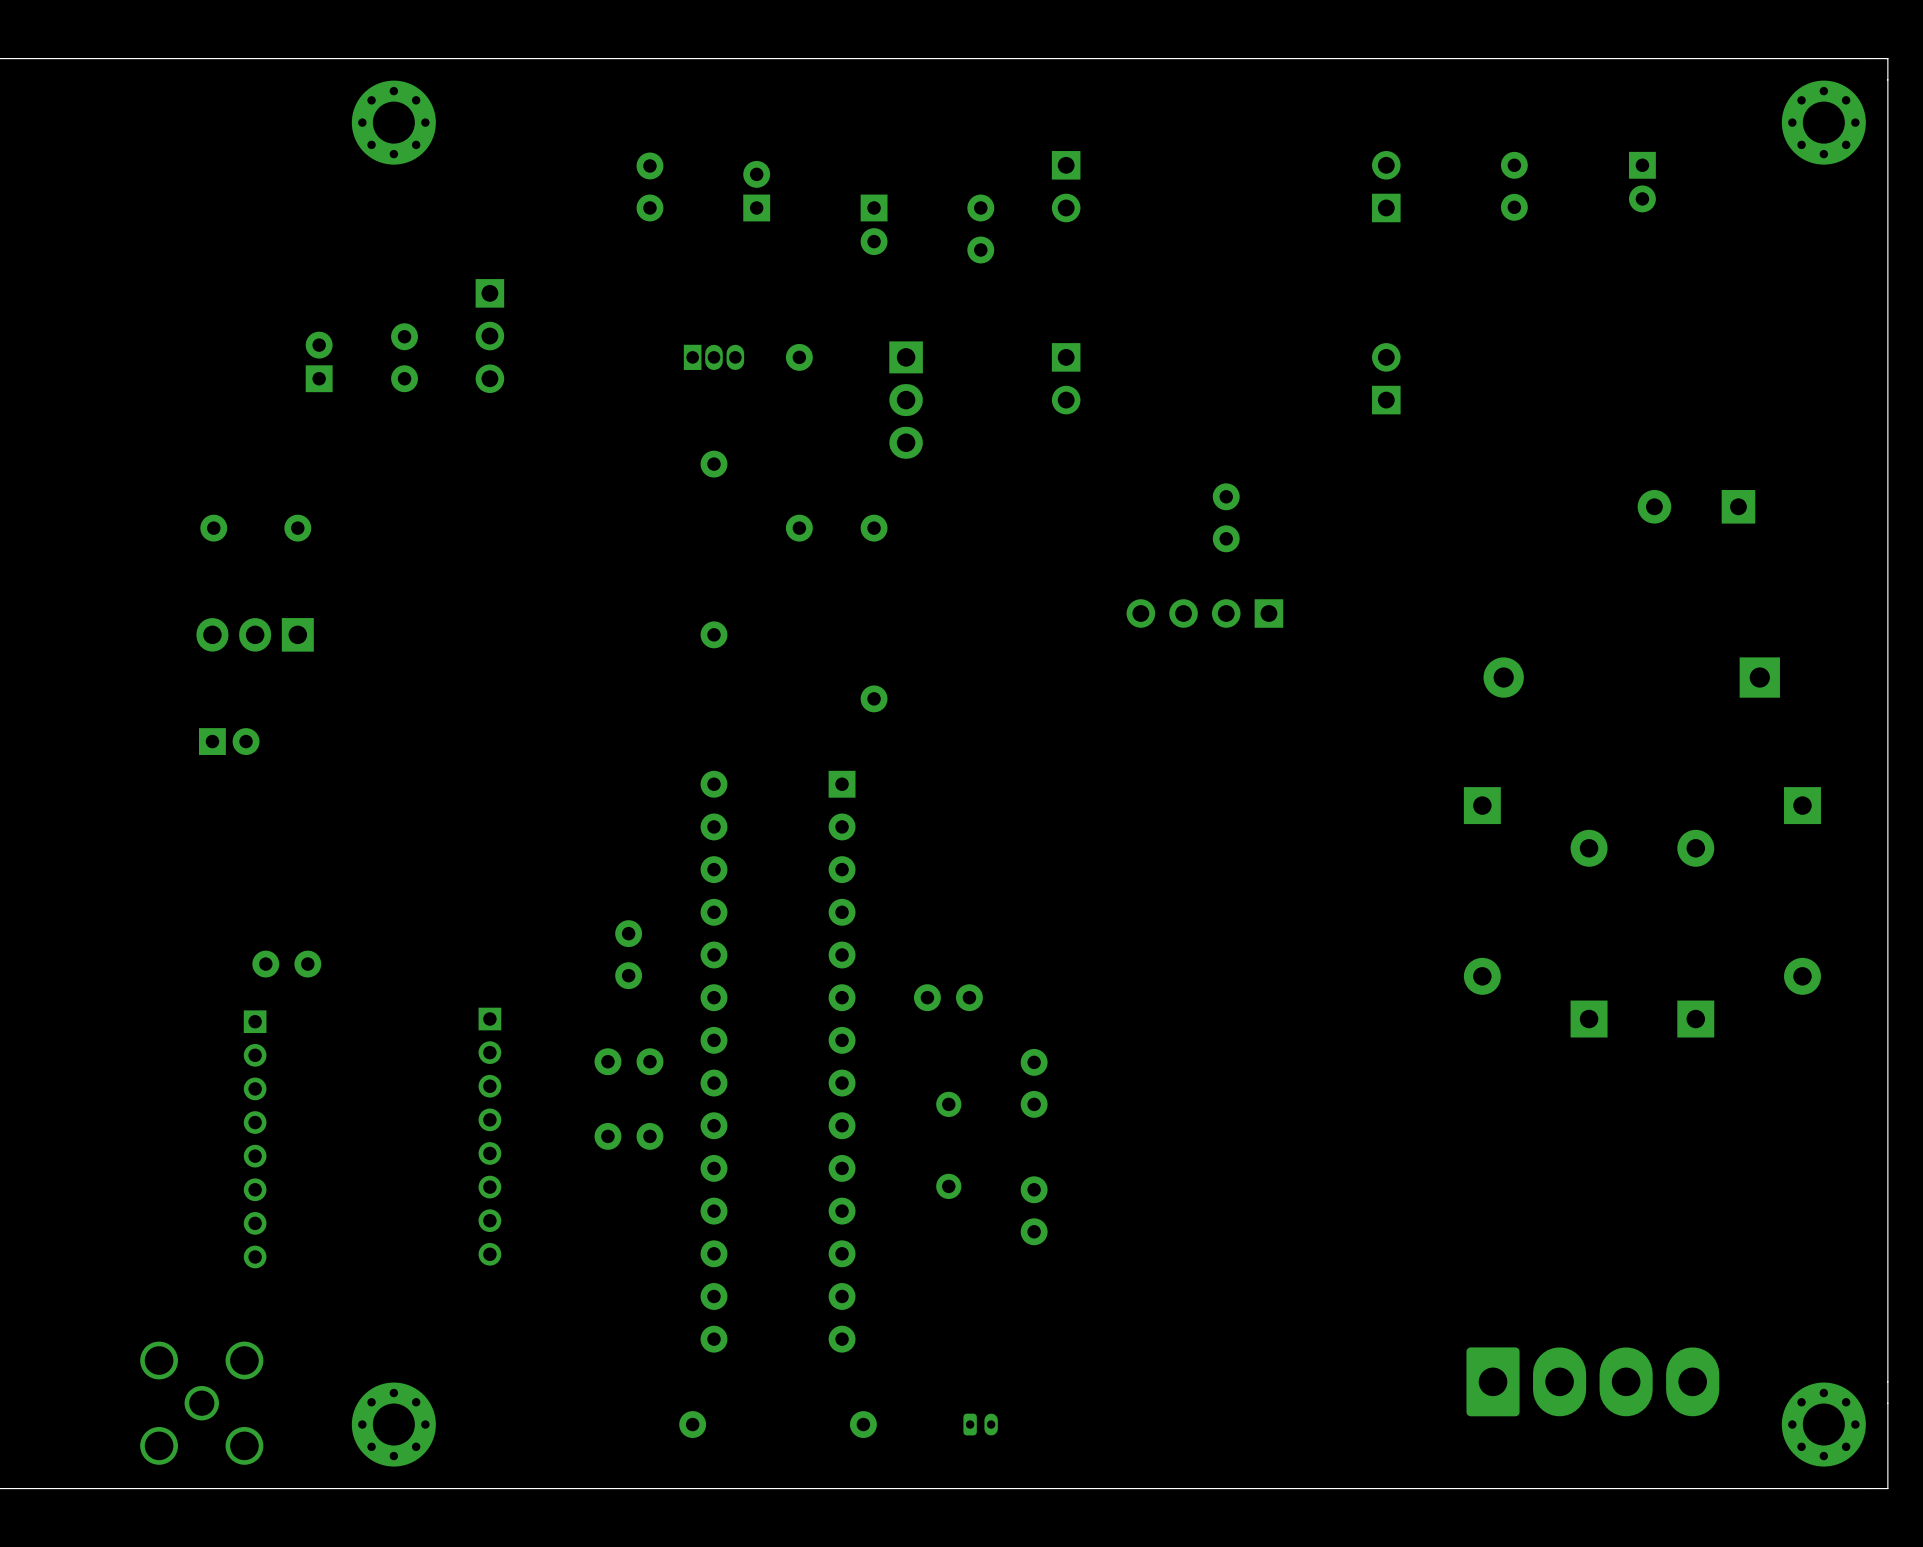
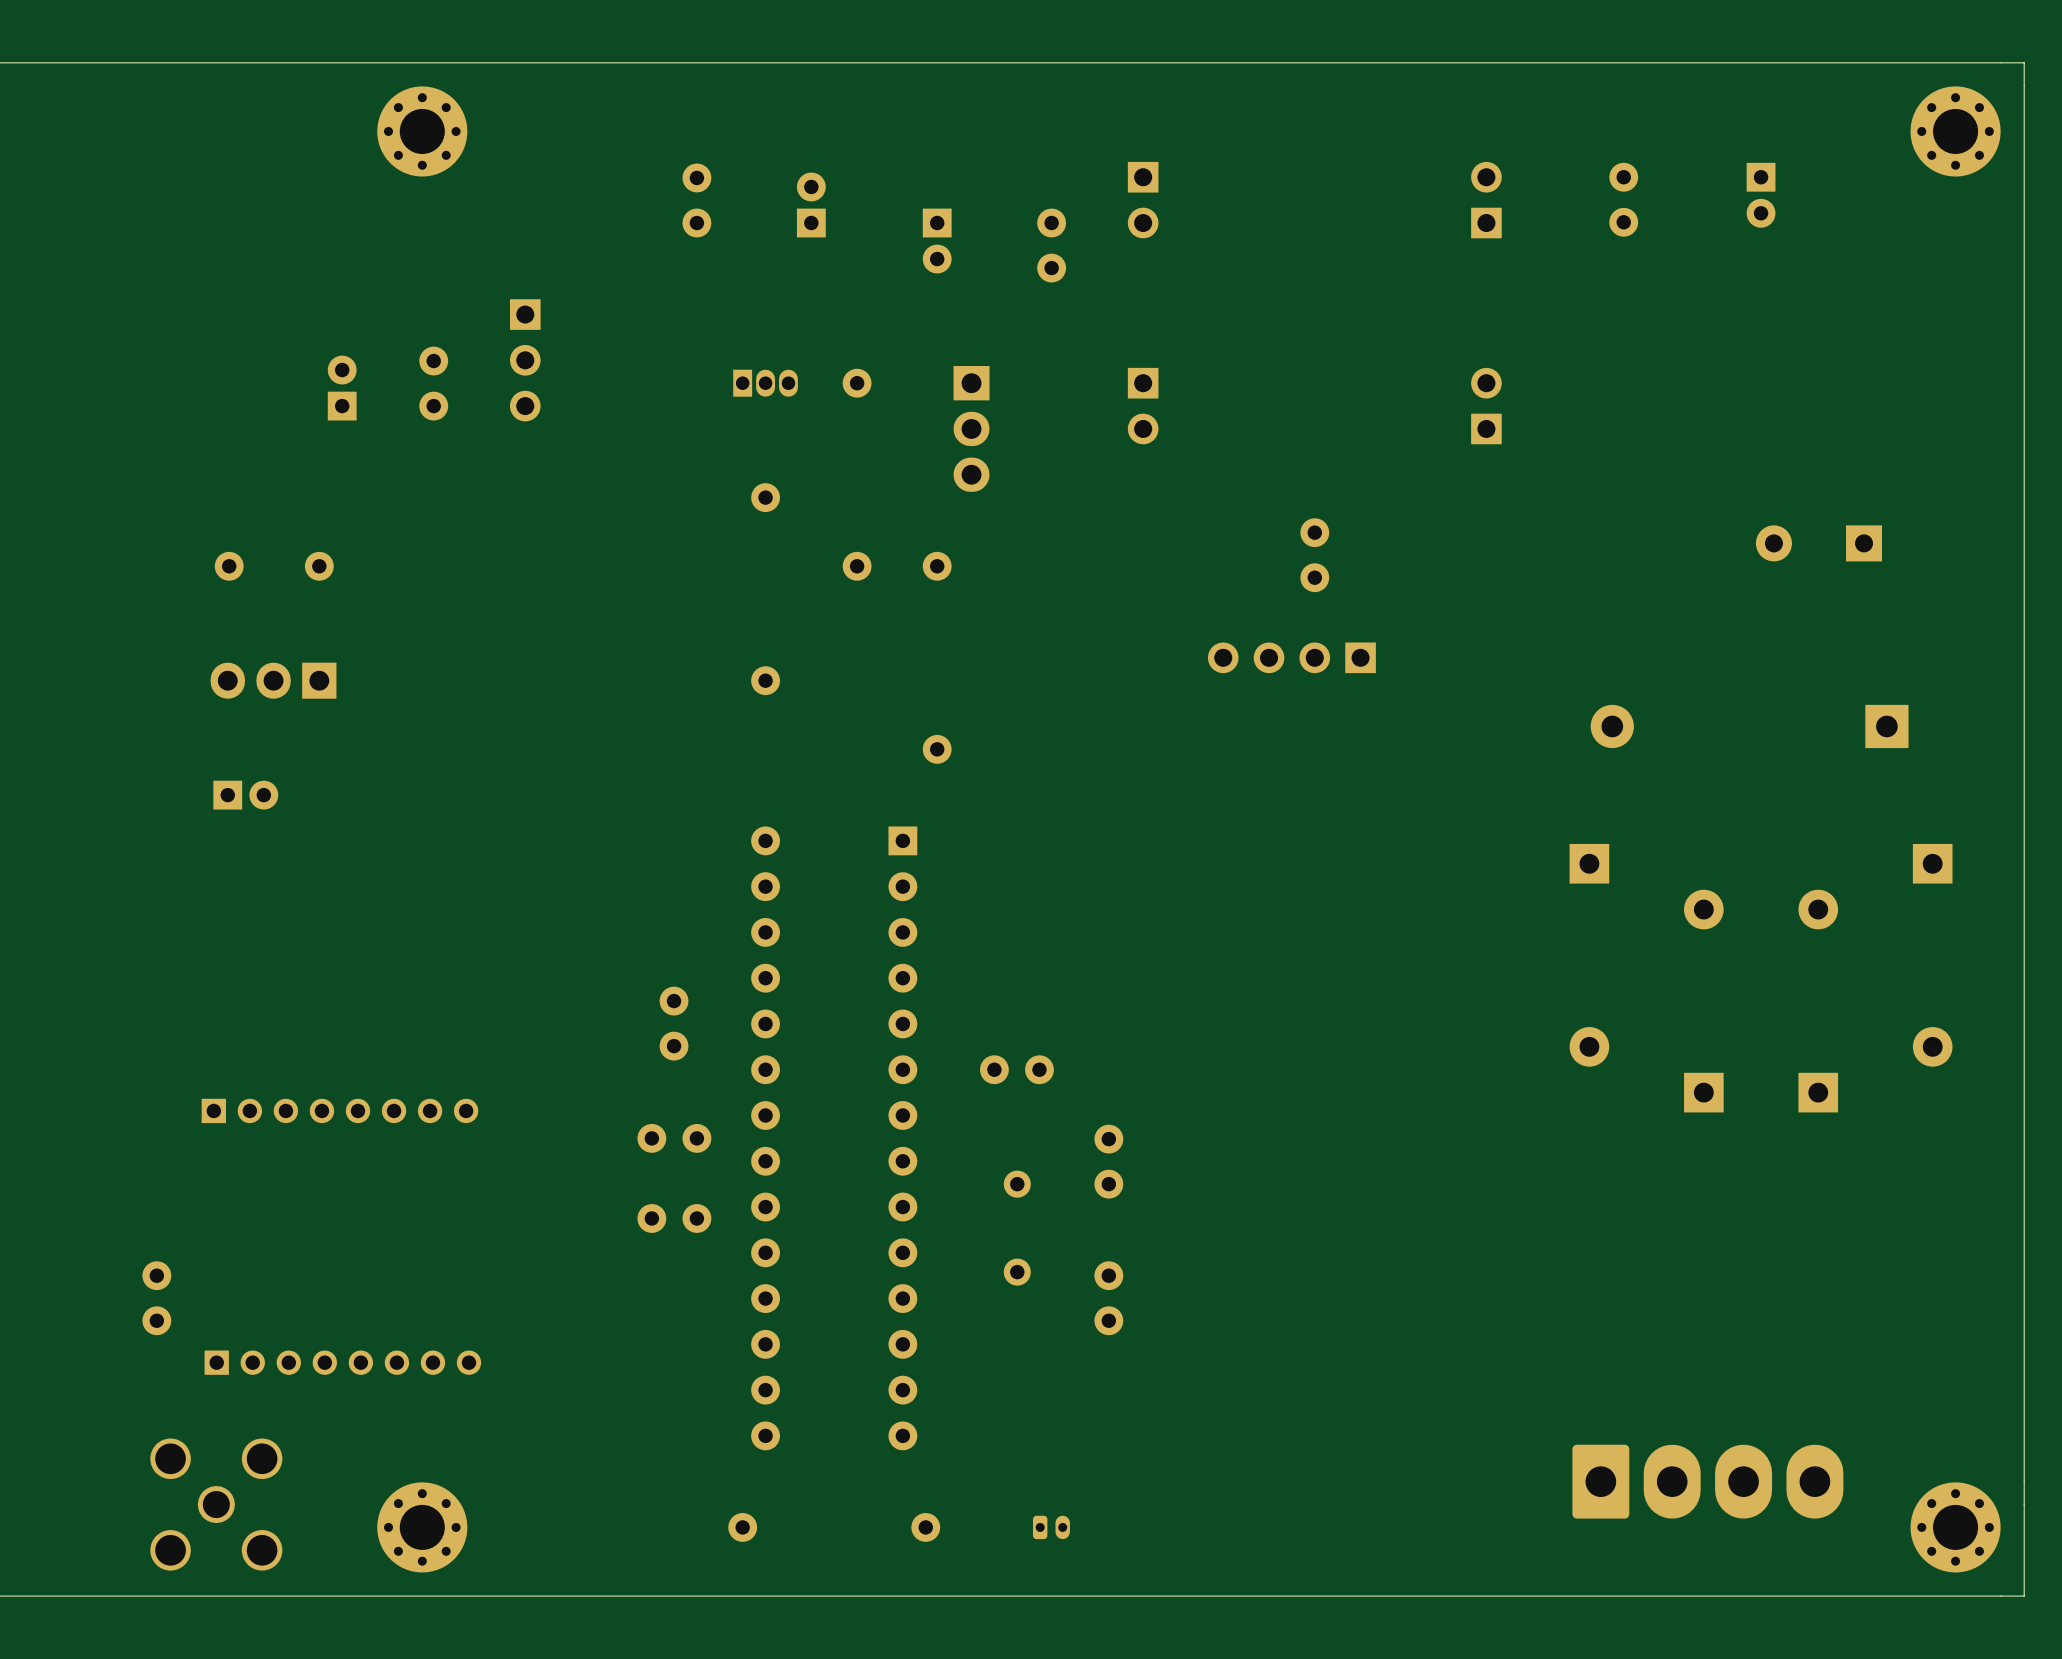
part rotation: 0° (286, 964) -> 90° clockwise (156, 1298)
part position: (286, 964) -> (156, 1298)
part: none -> (339, 1110)
part: (489, 1136) -> none
part: (255, 1139) -> none
part: none -> (342, 1362)

